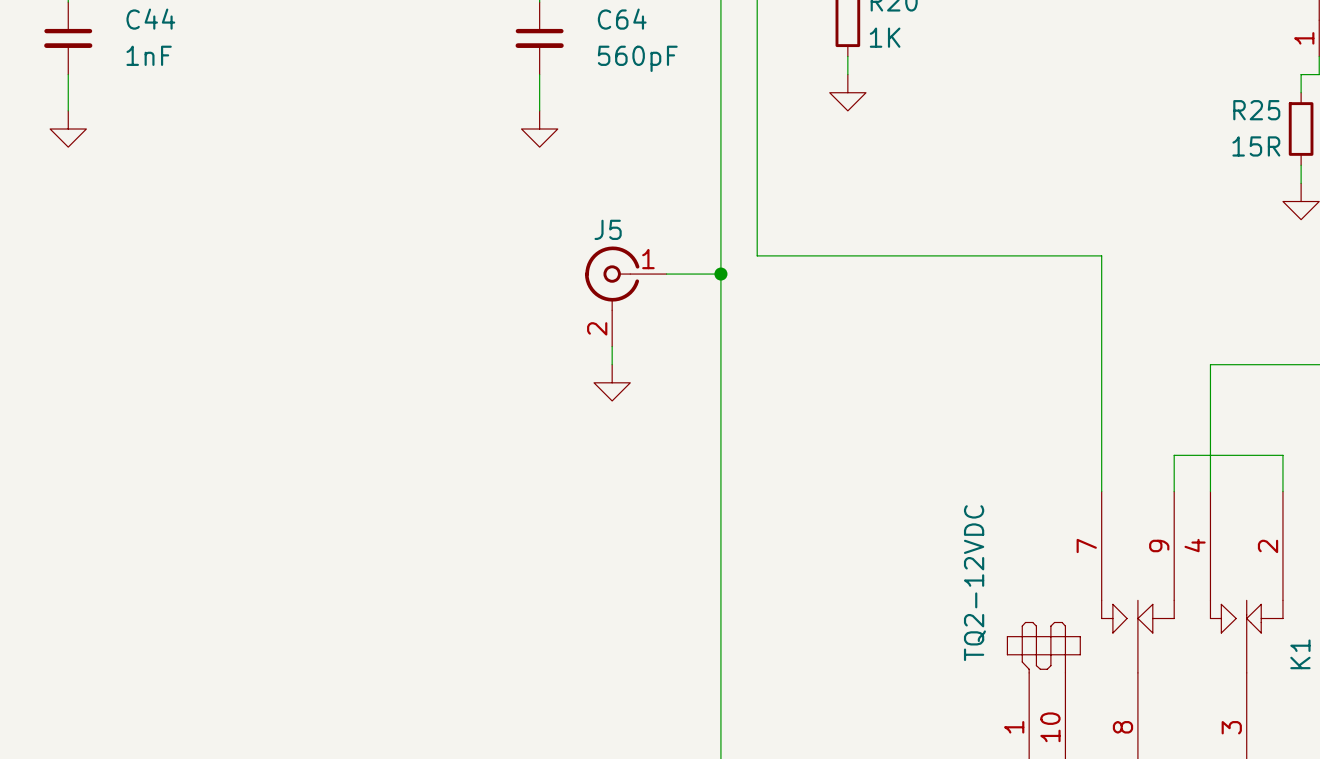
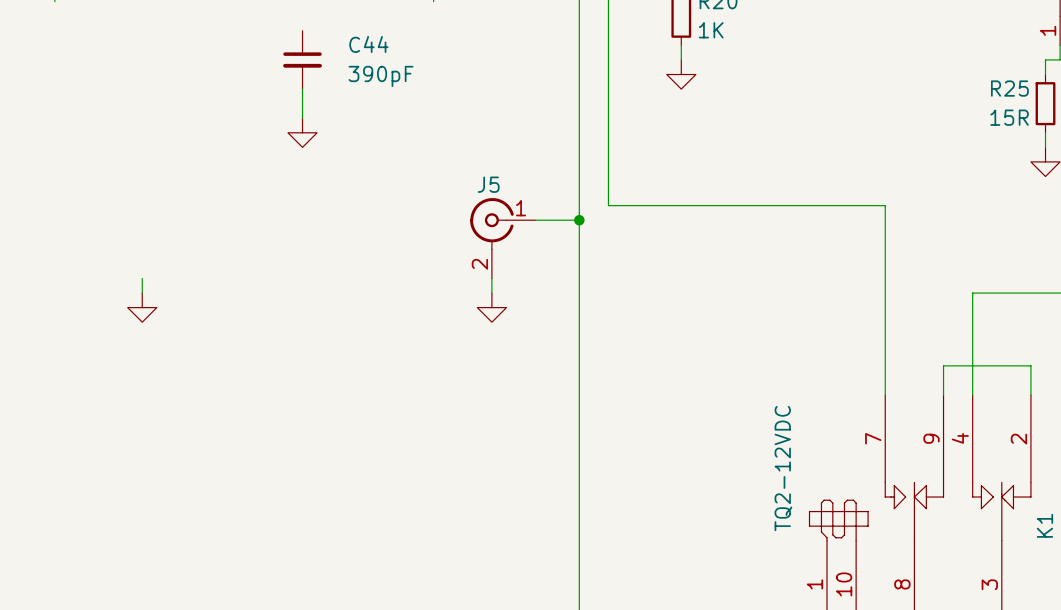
C44 position: (68, 38) -> (302, 59)
C64: 560pF (539, 38) -> none
C44 value: 1nF (149, 55) -> 390pF (381, 76)
wire: (68, 74) (68, 110) -> none
wire: (539, 74) (539, 110) -> (302, 89) (302, 118)
power symbol: (68, 129) -> none
power symbol: (539, 129) -> none
power symbol: none -> (302, 132)
wire: none -> (142, 278) (142, 293)
power symbol: none -> (142, 307)

